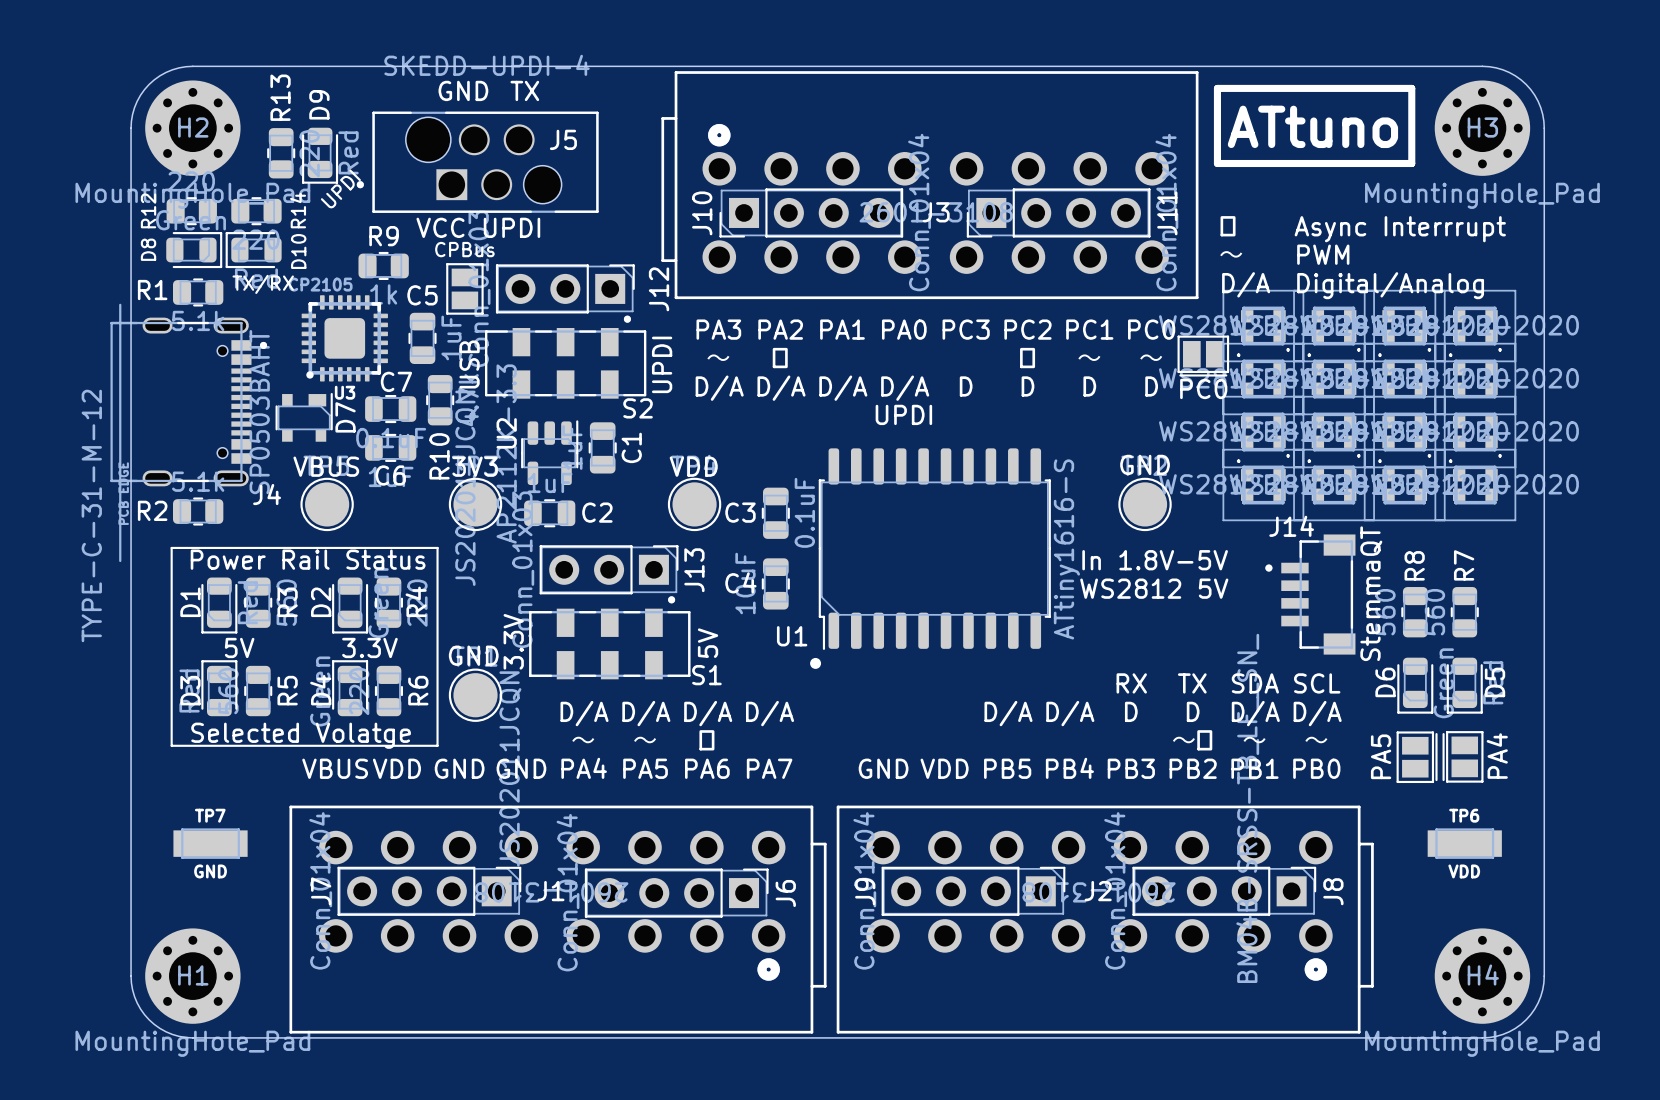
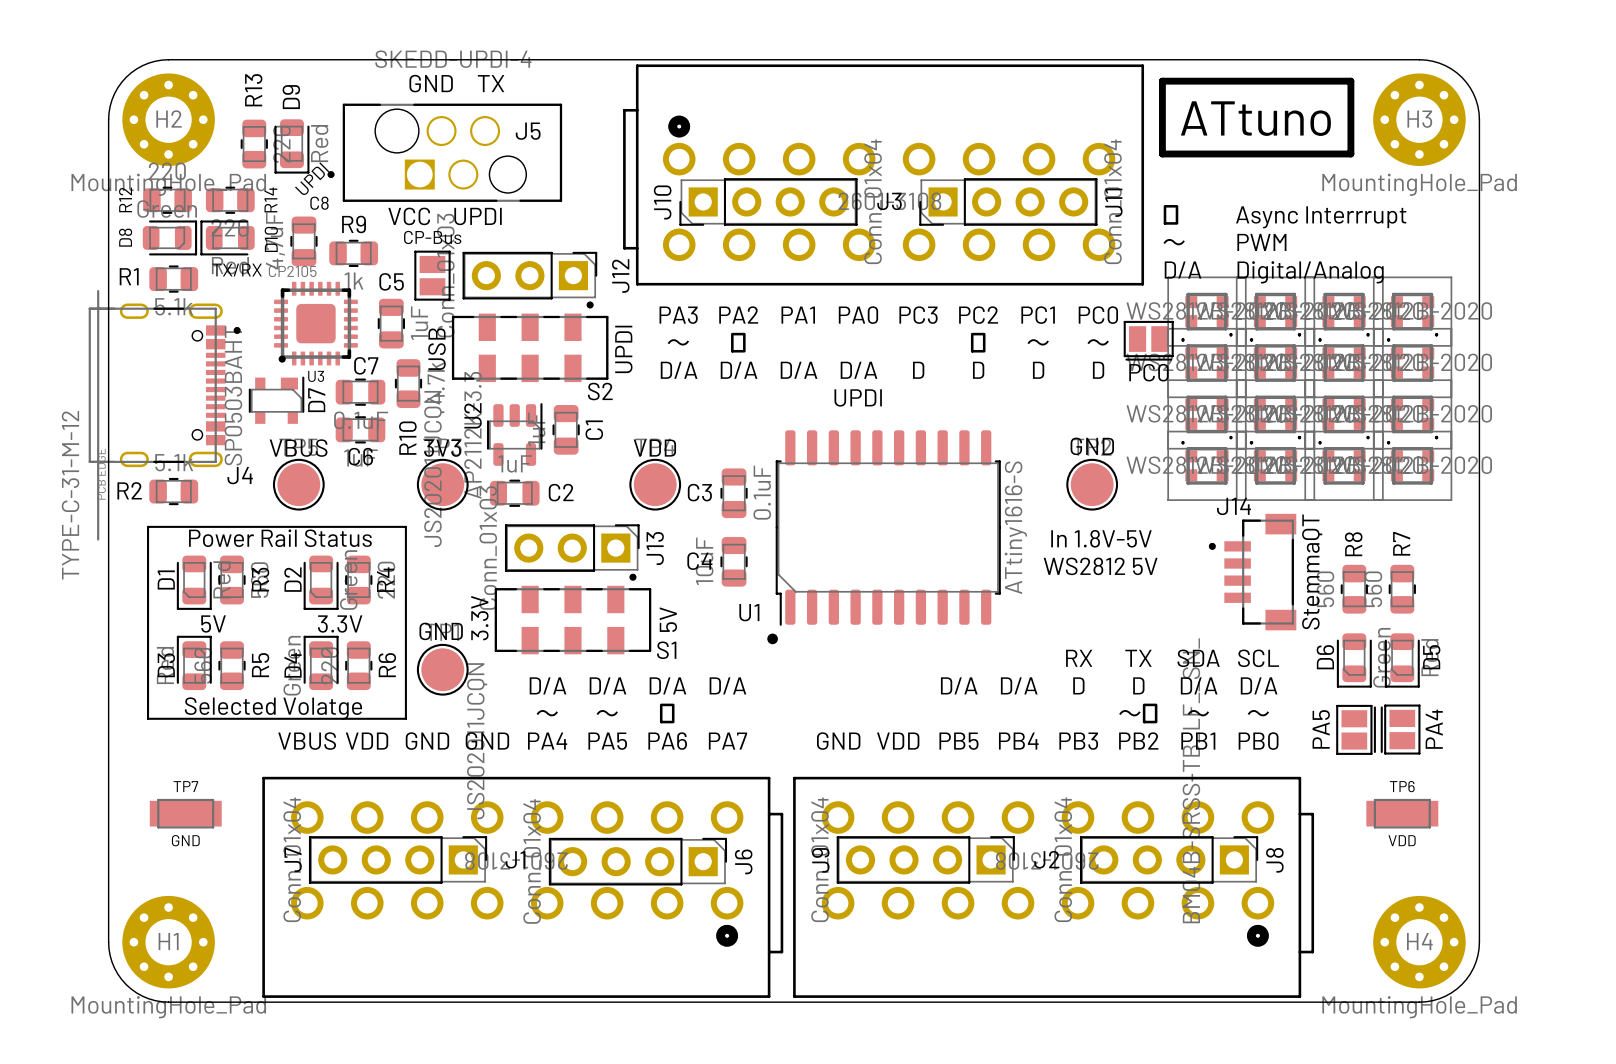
part value: CPBus (464, 249) -> CP-Bus (432, 237)
C8: none -> 4,7uF (303, 241)

